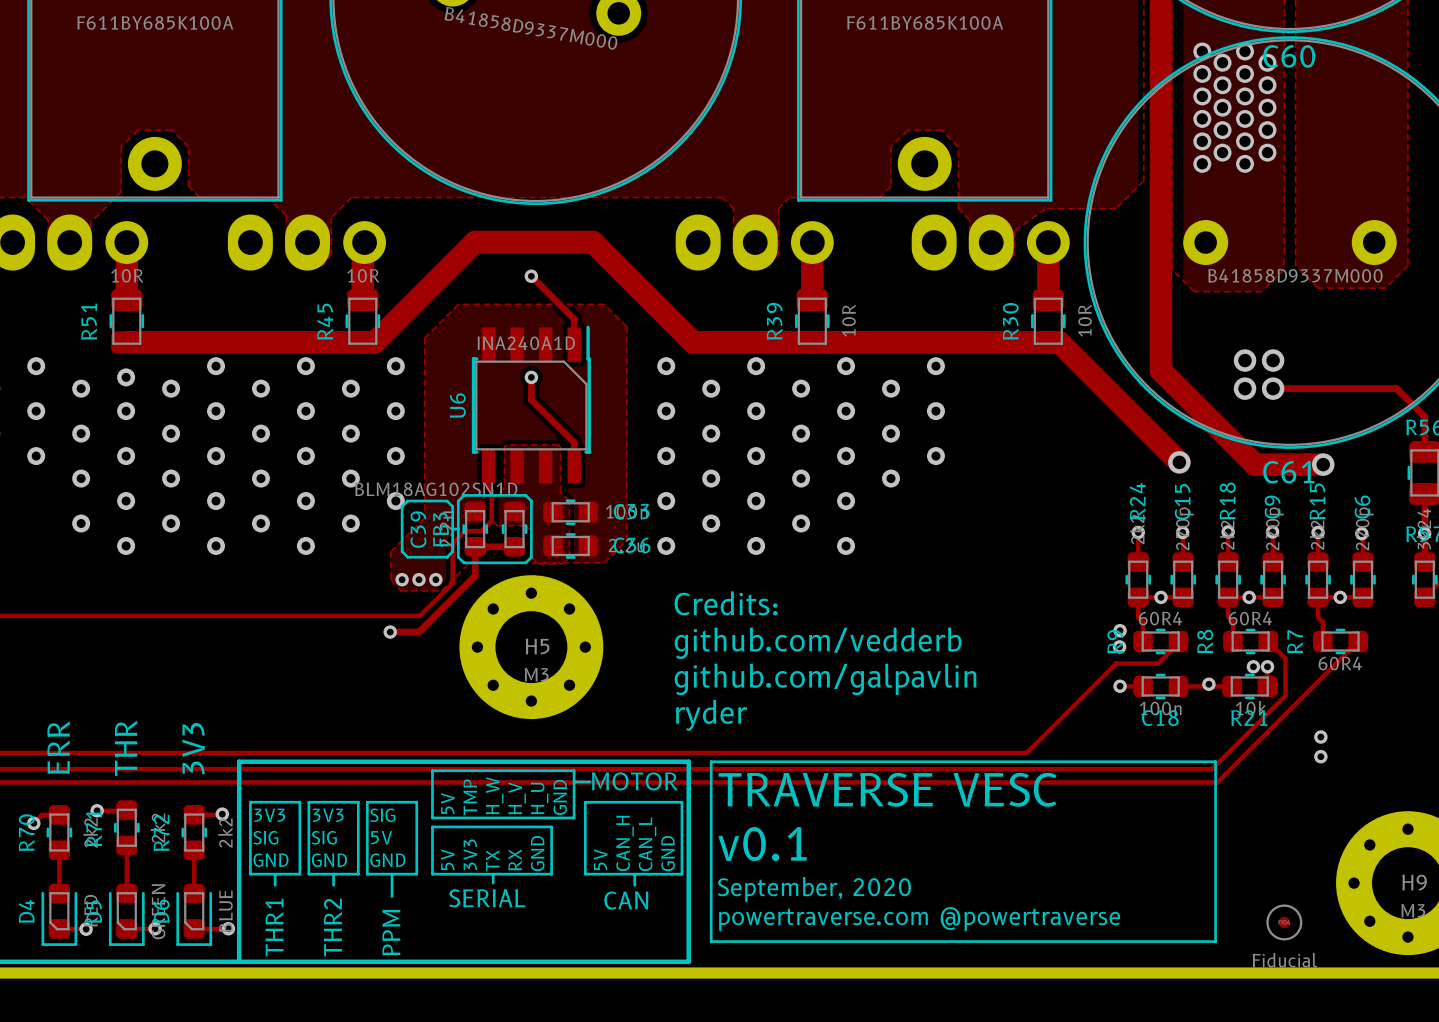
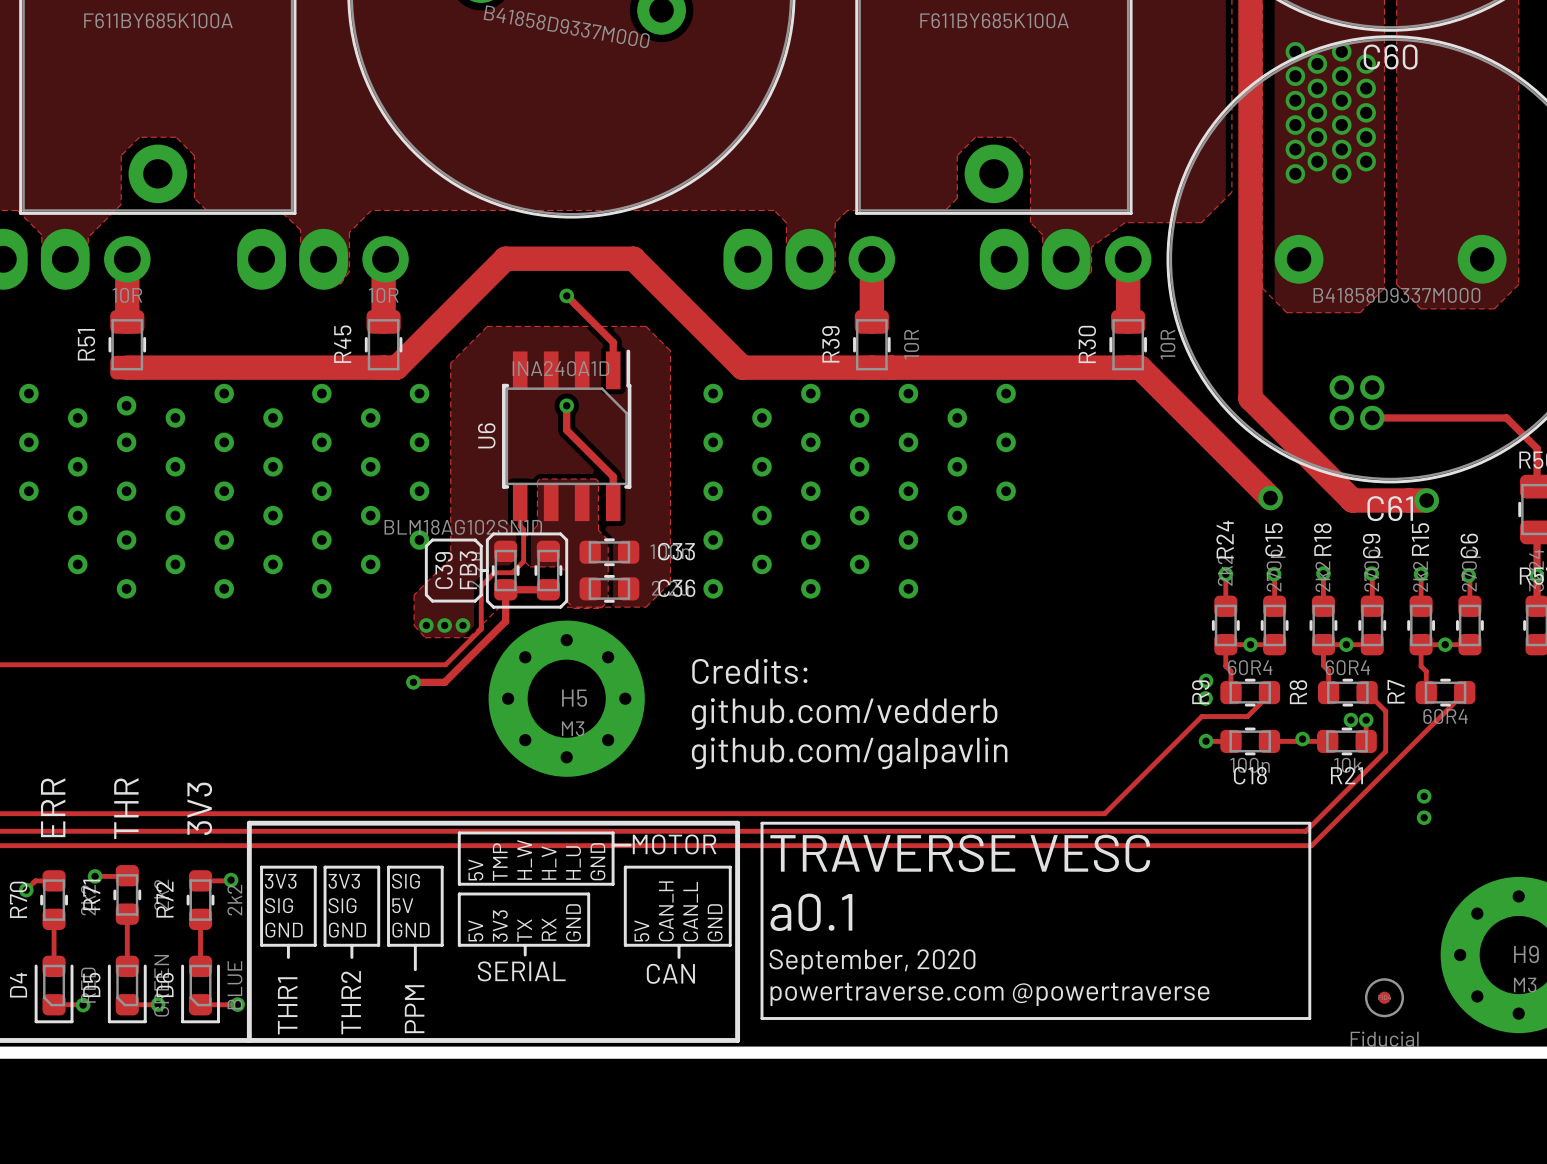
text position: Credits: (725, 603) -> Credits: (749, 671)
text position: github.com/vedderb (818, 643) -> github.com/vedderb (844, 714)
text position: github.com/galpavlin (825, 679) -> github.com/galpavlin (849, 753)
text: ryder (711, 715) -> none
text: v0.1 (762, 844) -> a0.1 (811, 912)

